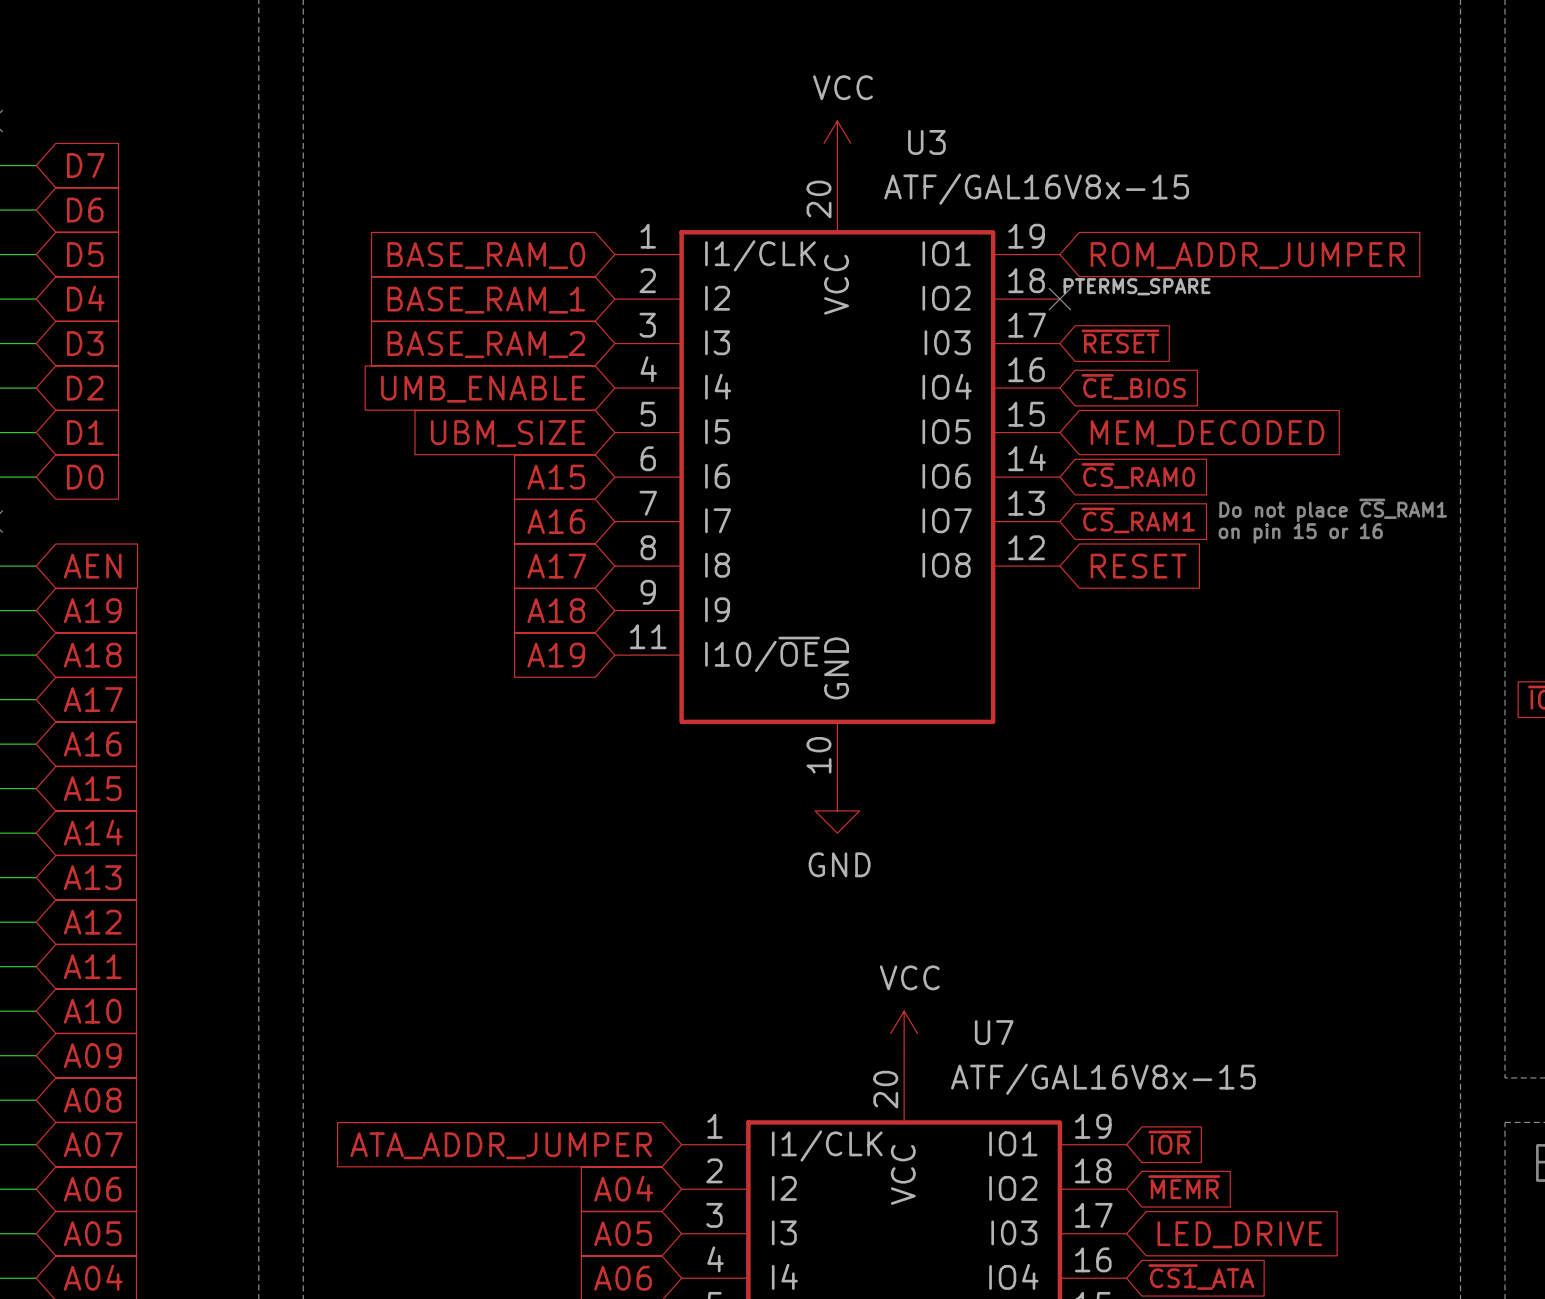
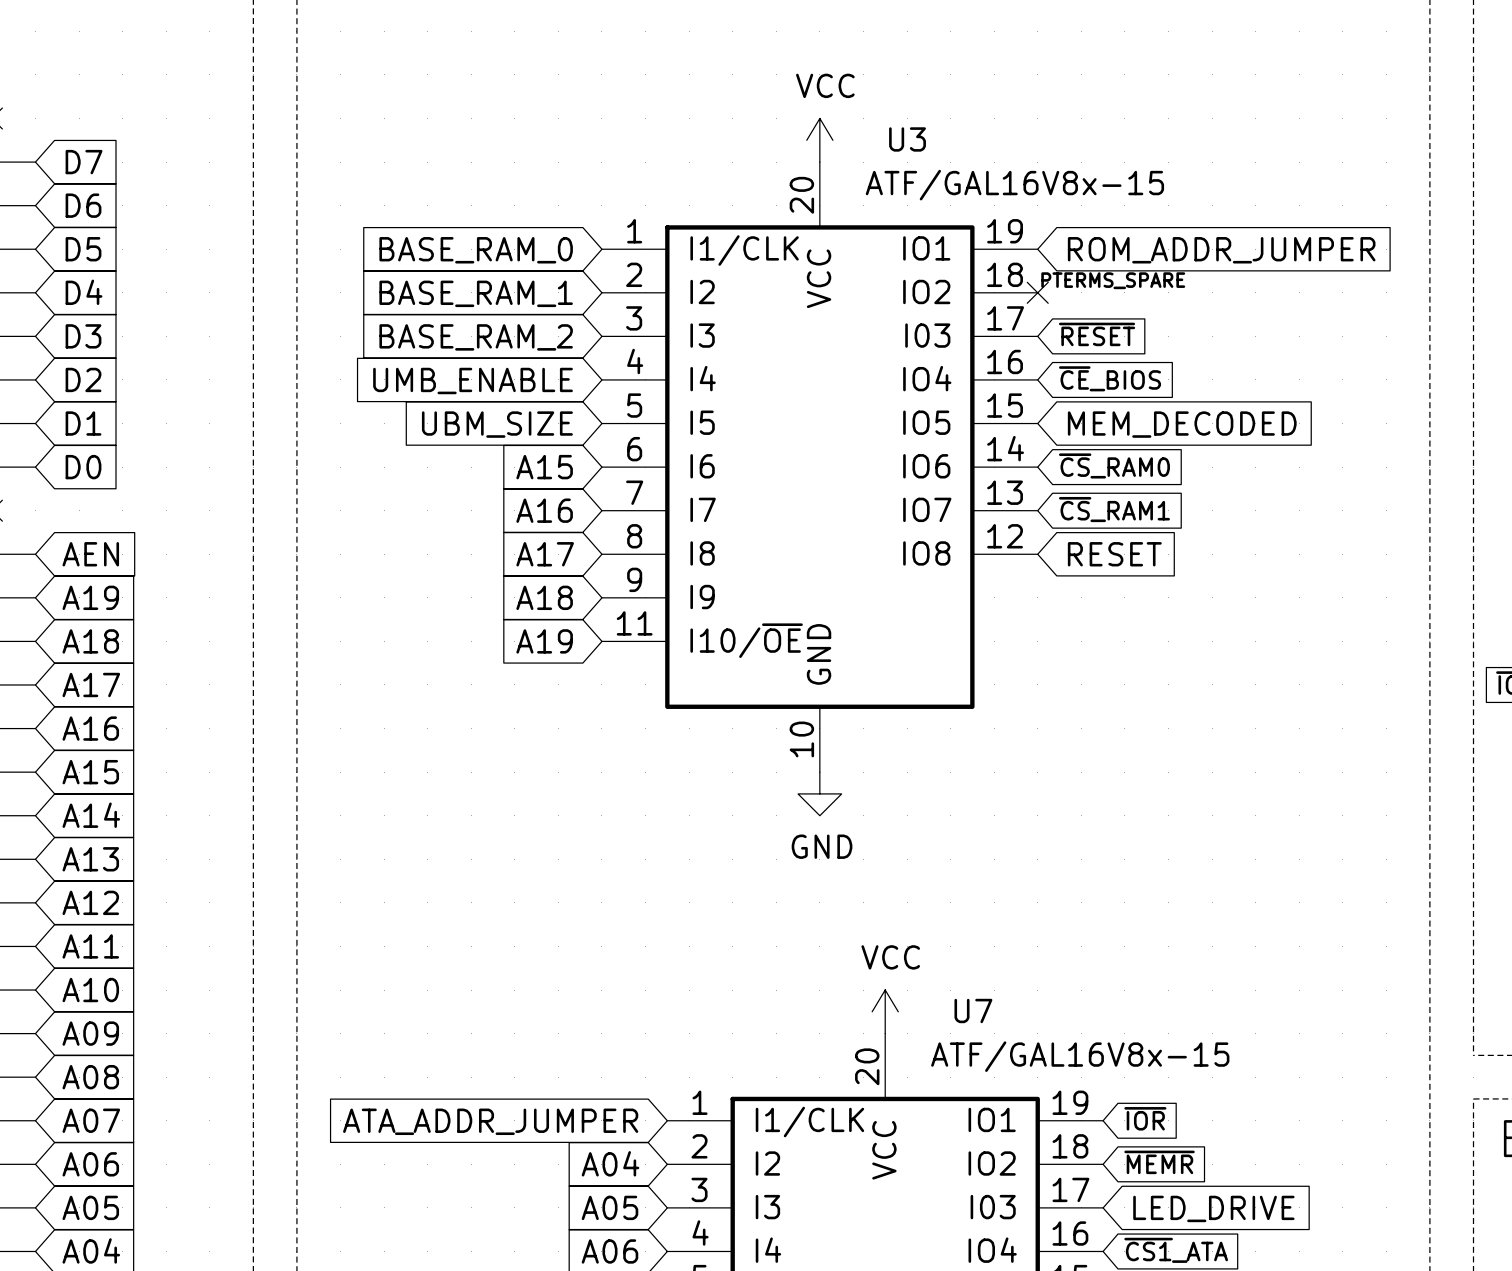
text: Do not place ~{CS}_RAM1 (1333, 510) -> none
text: on pin 15 or 16 (1300, 533) -> none

